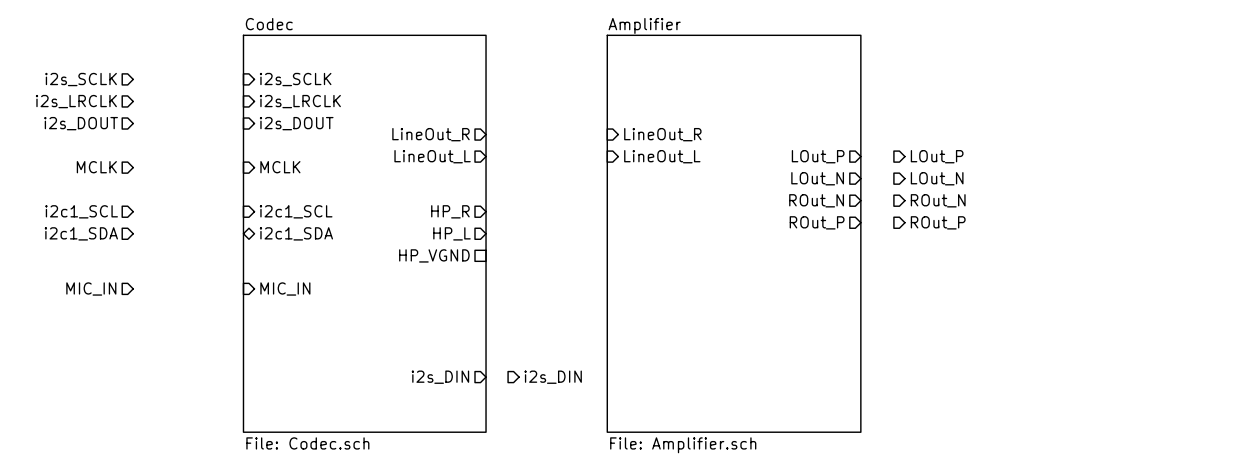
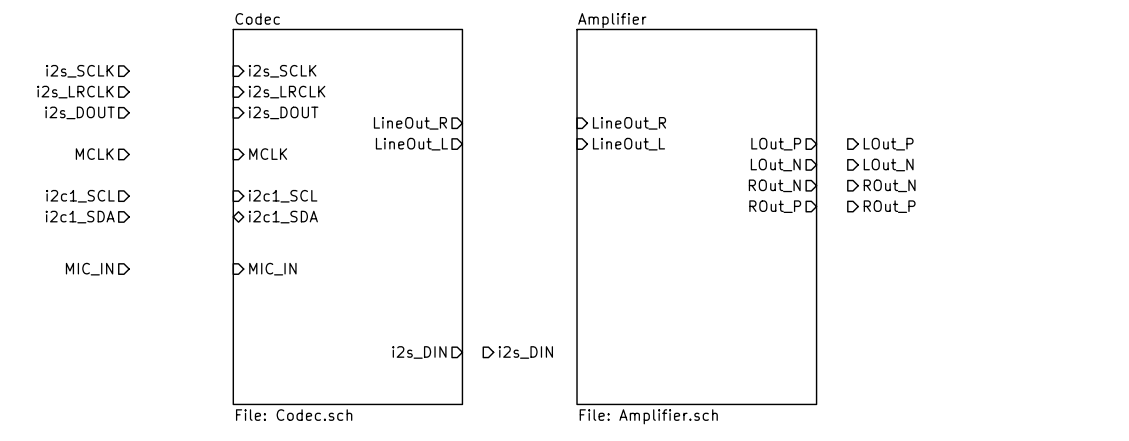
sheet pin: HP_R (450, 211) -> none
sheet pin: HP_L (451, 233) -> none
sheet pin: HP_VGND (434, 255) -> none

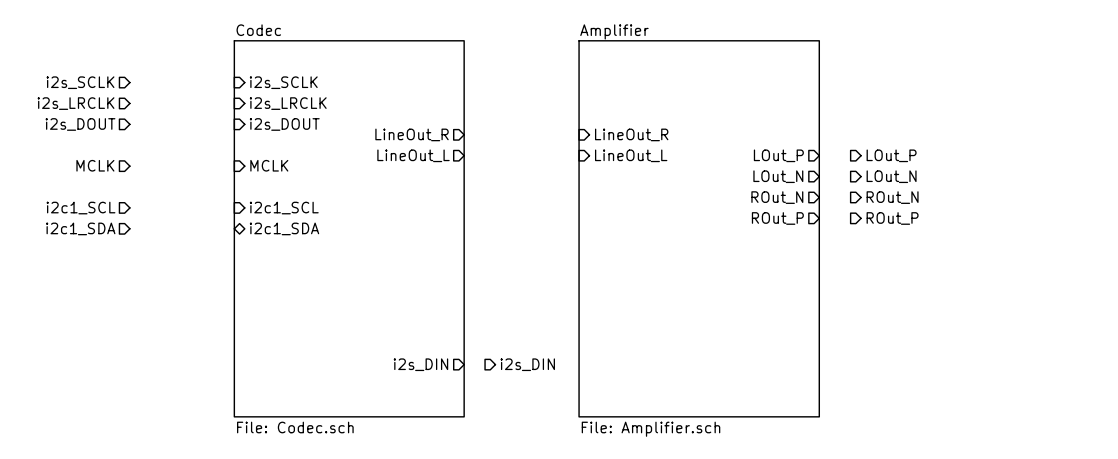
hierarchical label: MIC_IN (89, 269) -> none
sheet pin: MIC_IN (272, 269) -> none

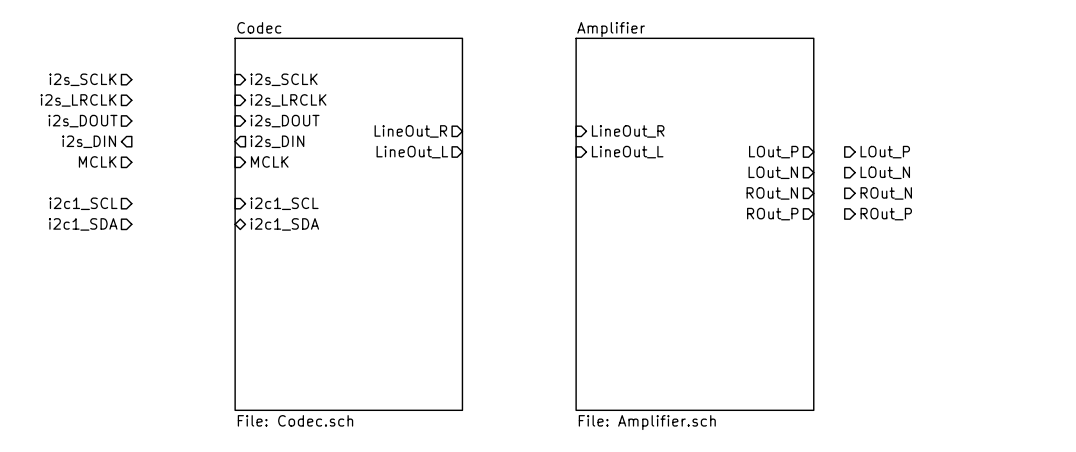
hierarchical label: none -> i2s_DIN (89, 141)
sheet pin: none -> i2s_DIN (277, 141)
sheet pin: i2s_DIN (420, 364) -> none
hierarchical label: i2s_DIN (527, 364) -> none

